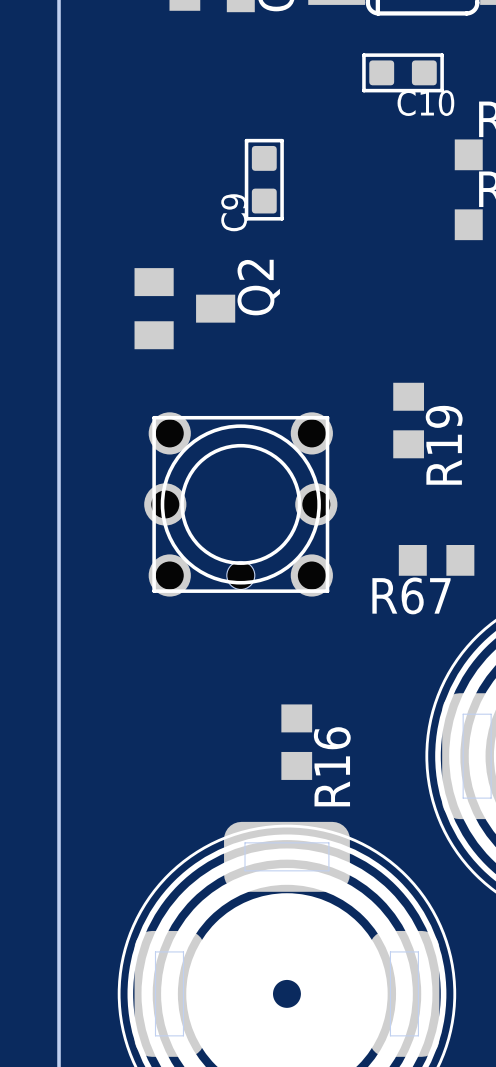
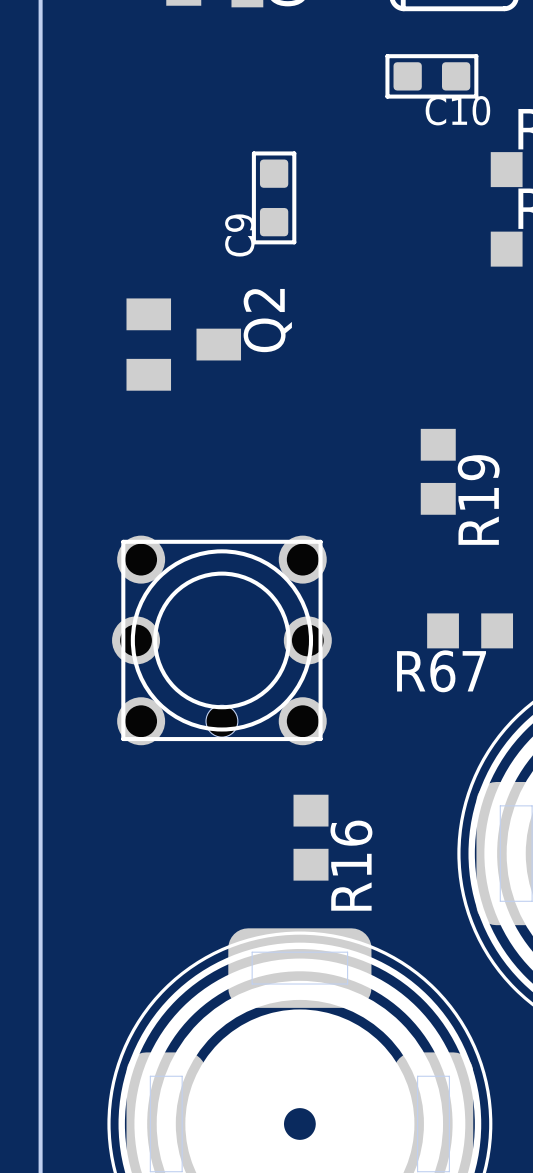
part position: (240, 504) -> (221, 640)

